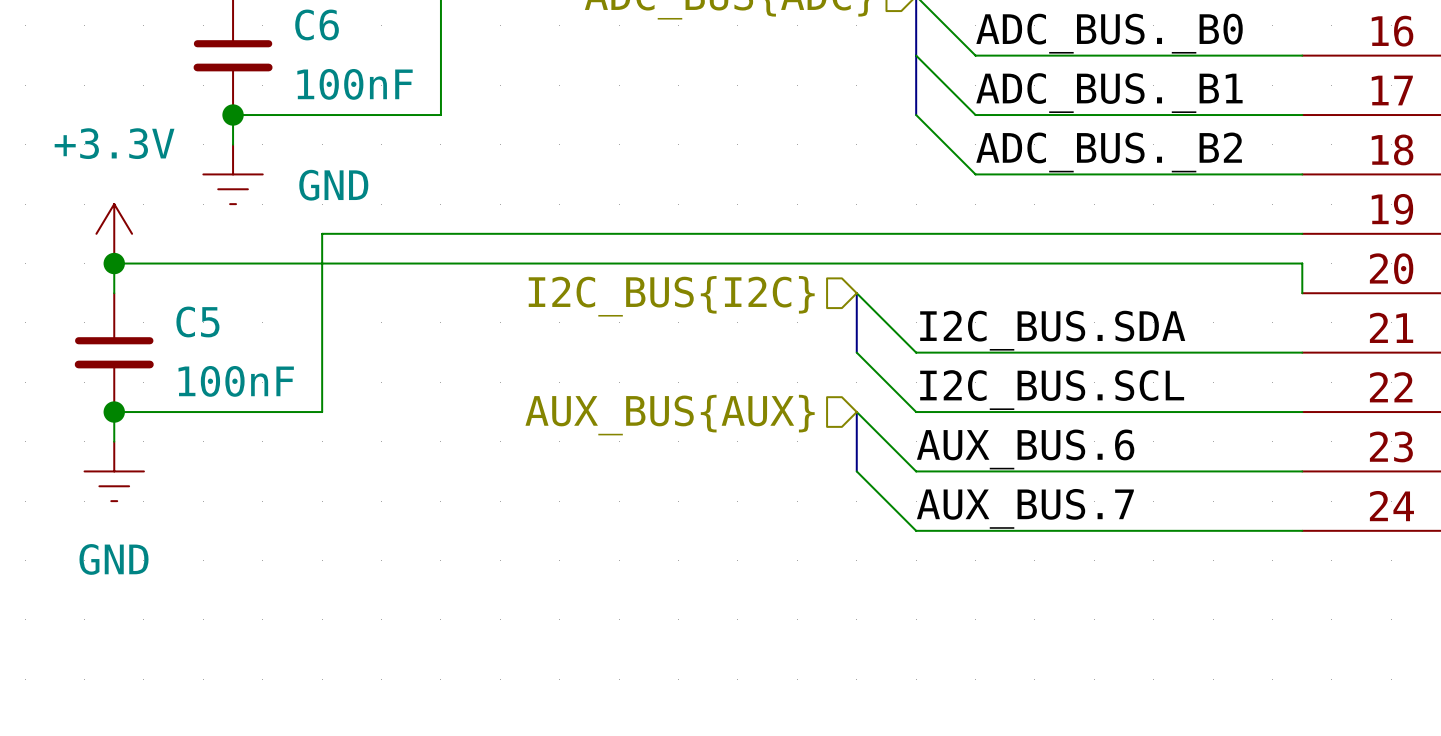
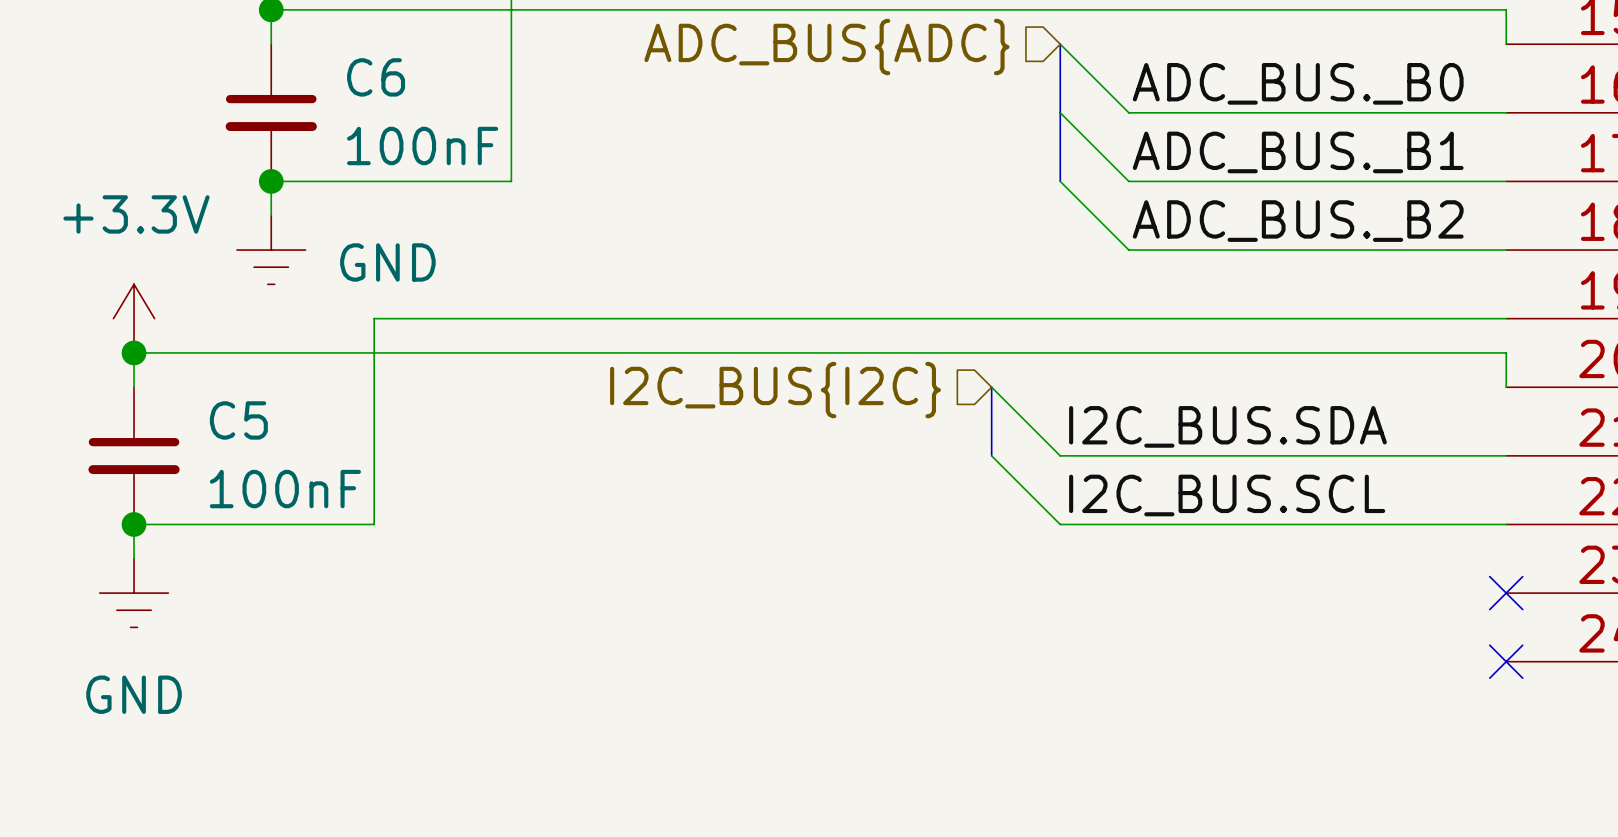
wire: (856, 412) (916, 471) (1302, 471) -> none
bus: (856, 412) (856, 471) -> none
hierarchical label: AUX_BUS{AUX} (670, 415) -> none
label: AUX_BUS.6 (1025, 449) -> none
wire: (856, 471) (916, 530) (1302, 530) -> none
no-connect mark: none -> (1506, 593)
label: AUX_BUS.7 (1025, 508) -> none
no-connect mark: none -> (1506, 661)

